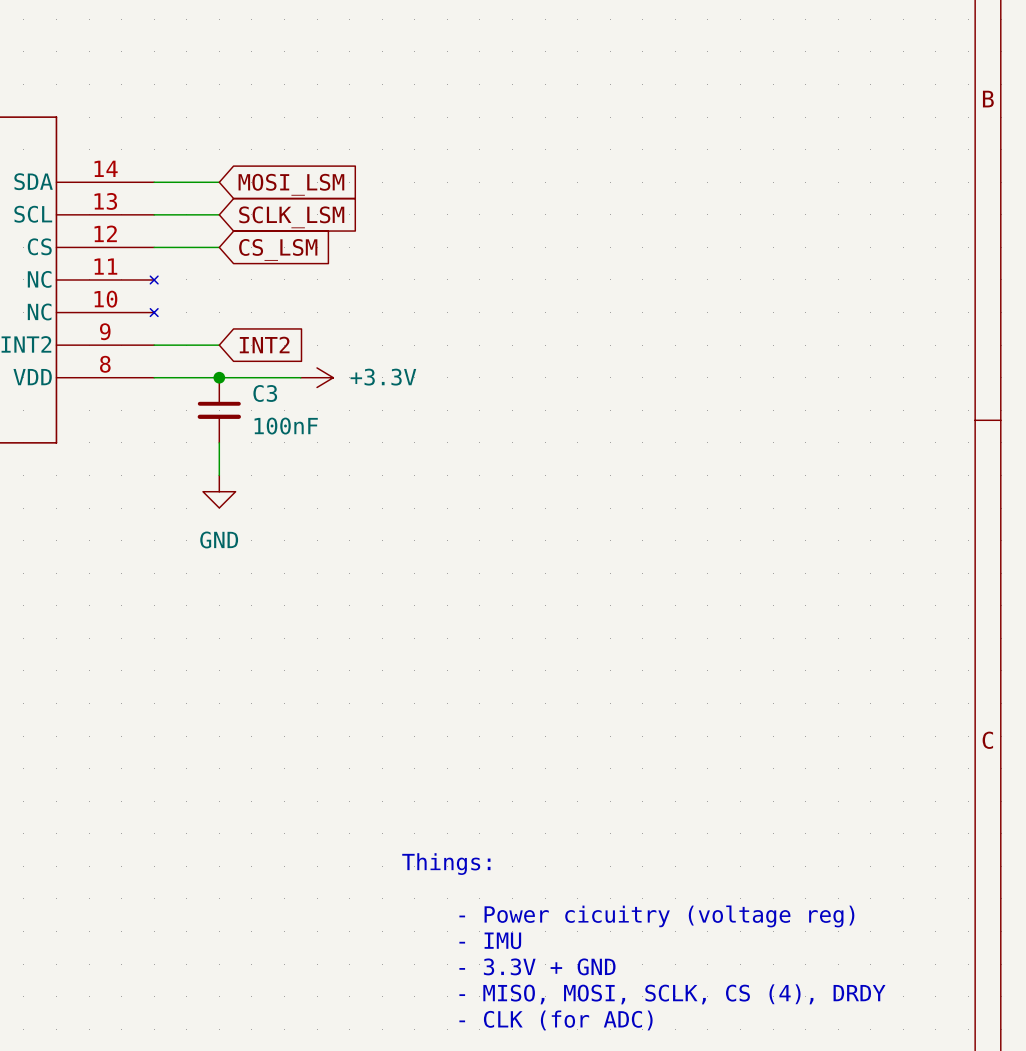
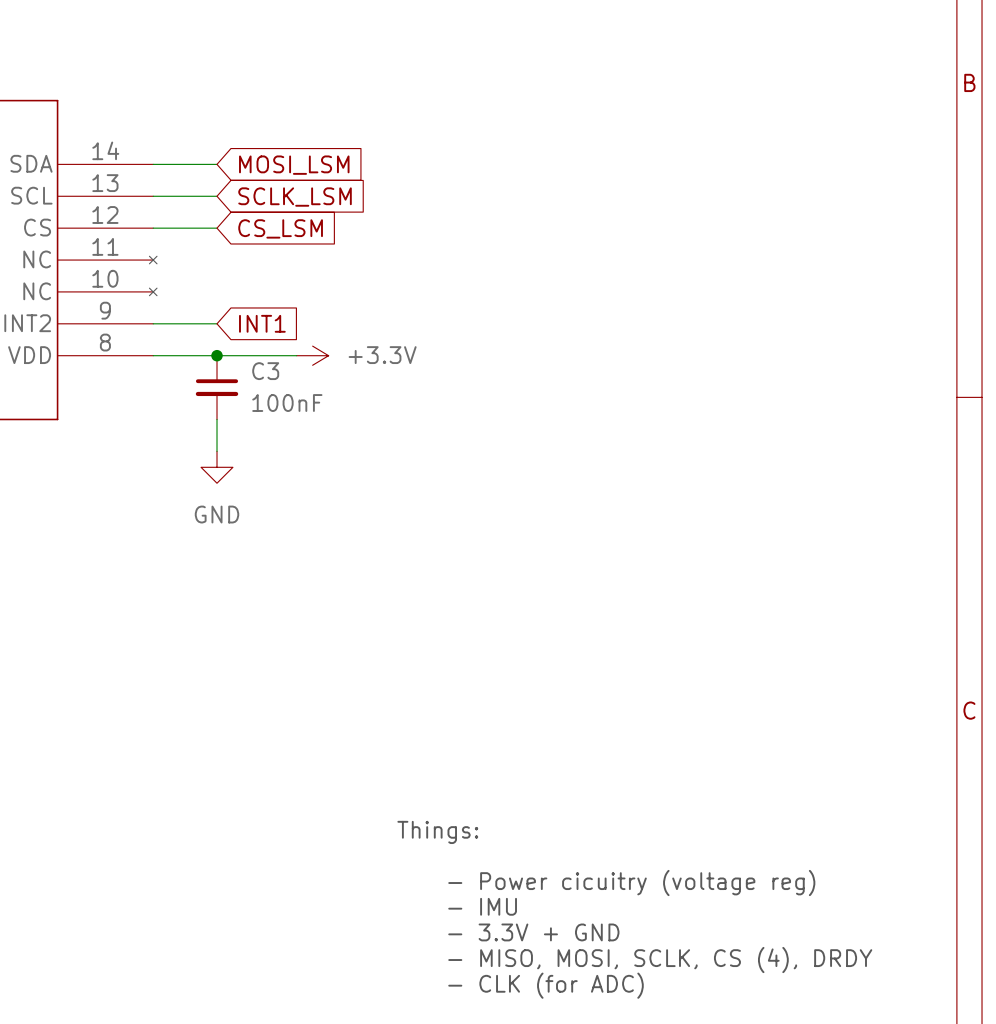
global label: INT2 (264, 344) -> INT1 (262, 323)

